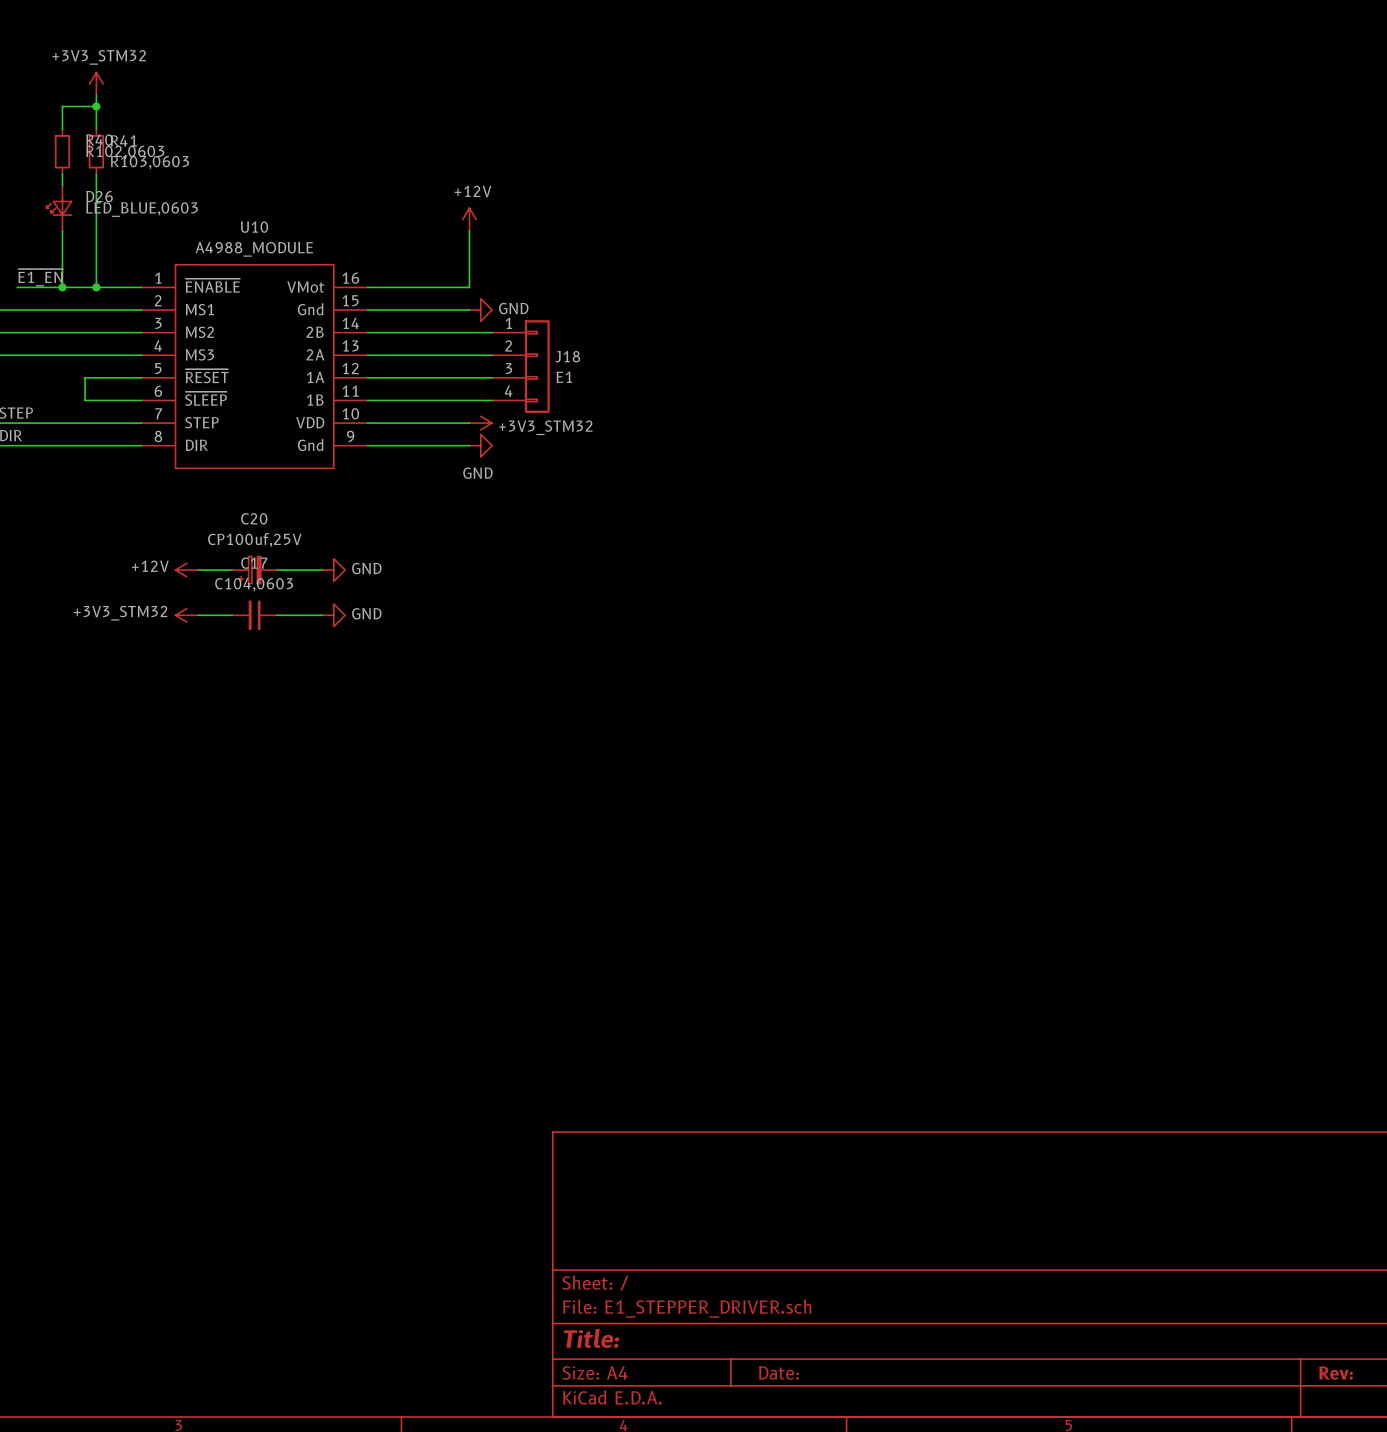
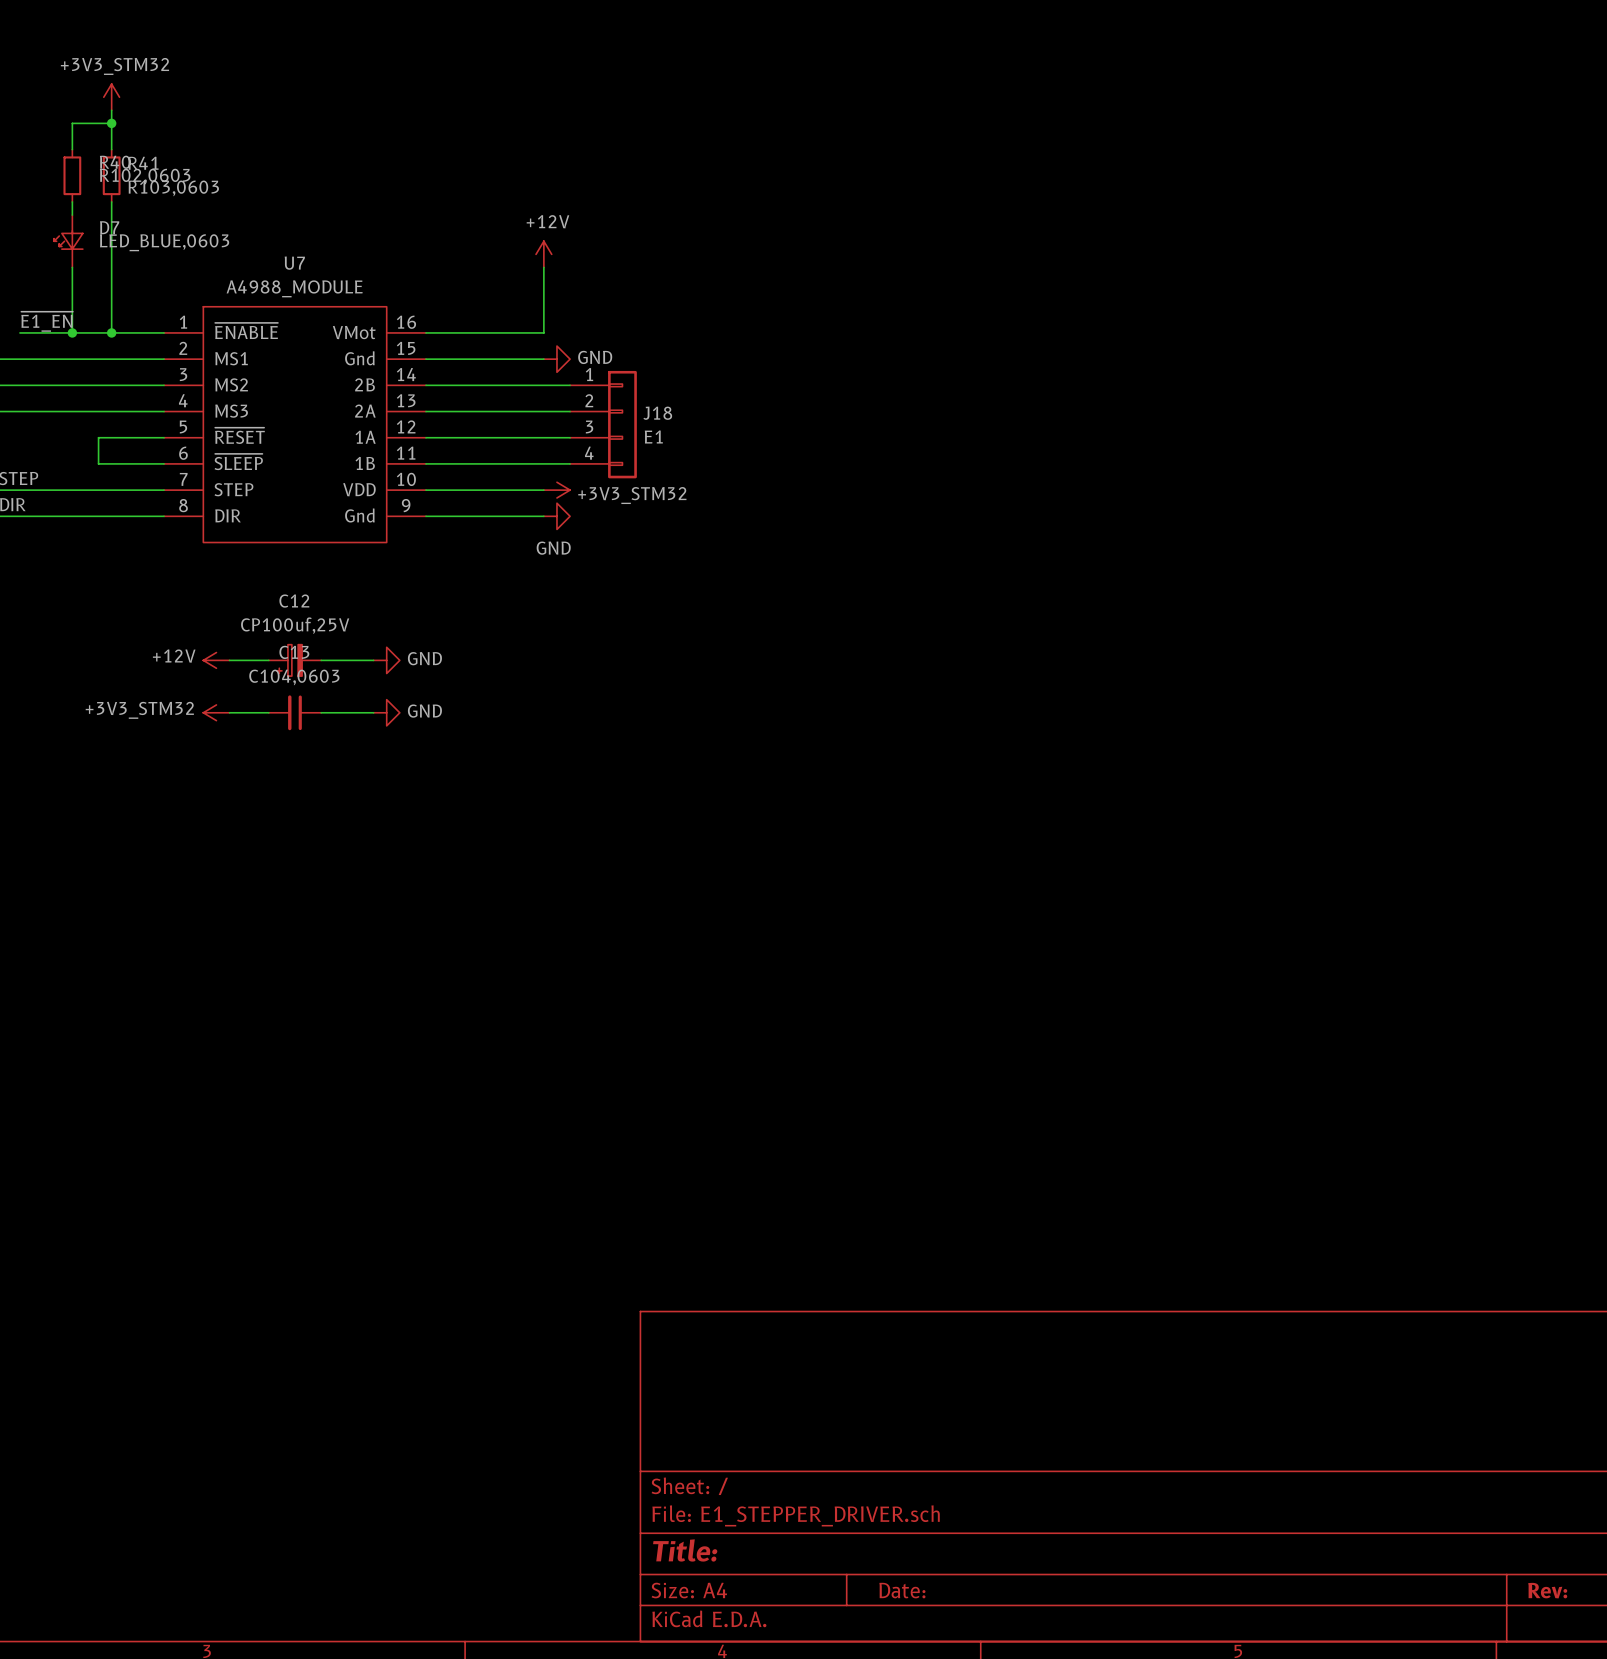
D26 name: D26 (99, 196) -> D7 (109, 227)
U10 name: U10 (254, 227) -> U7 (294, 263)
C20 name: C20 (254, 518) -> C12 (294, 601)
C17 name: C17 (254, 563) -> C13 (294, 652)

